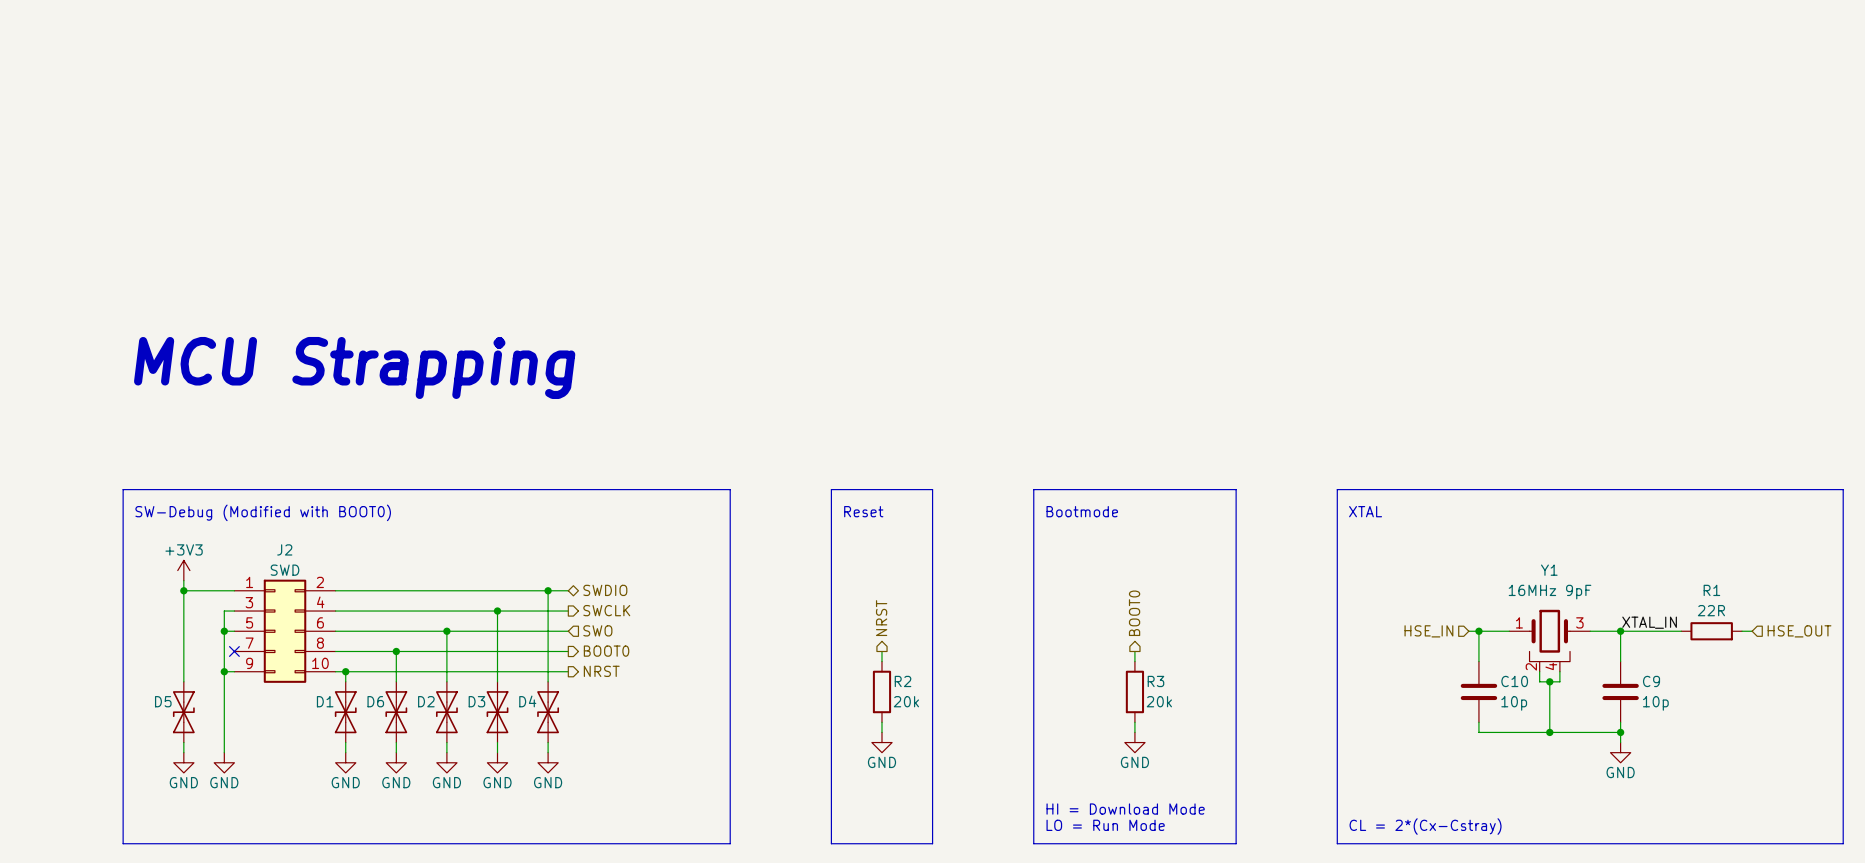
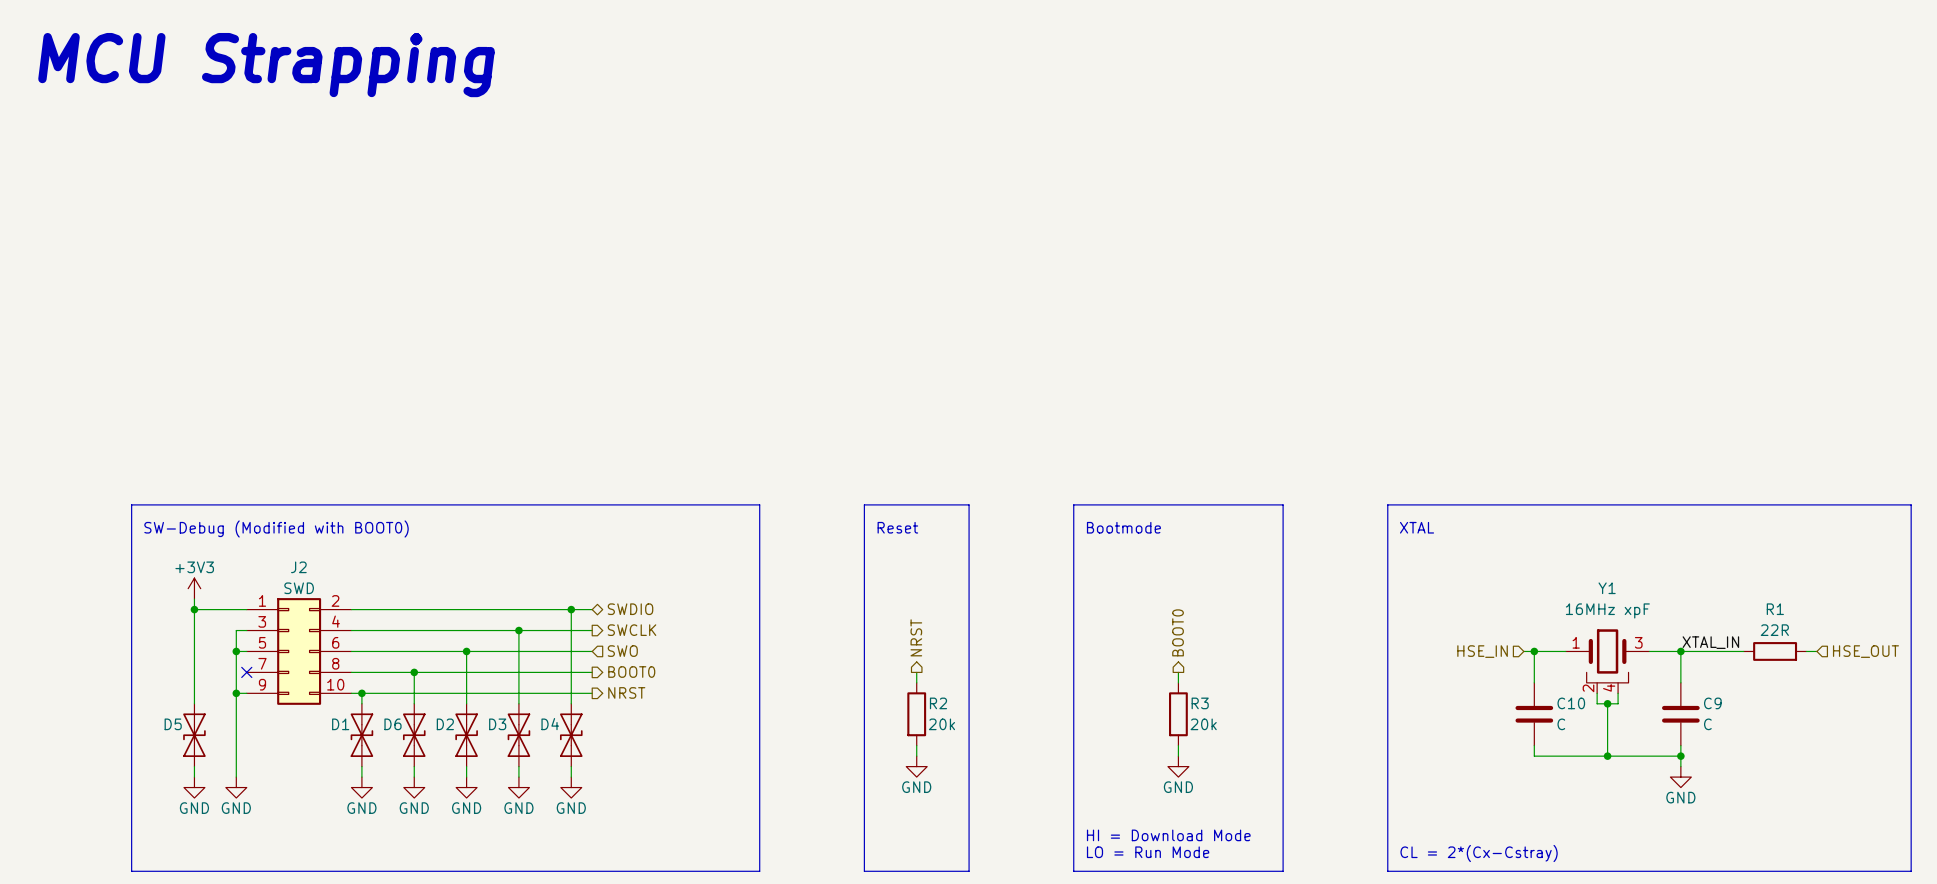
text: none -> MCU Strapping (266, 65)
text: MCU Strapping (354, 367) -> none
Y1 value: 16MHz 9pF (1550, 592) -> 16MHz xpF (1607, 610)
C10 value: 10p (1514, 703) -> C (1561, 724)
C9 value: 10p (1655, 703) -> C (1707, 724)

